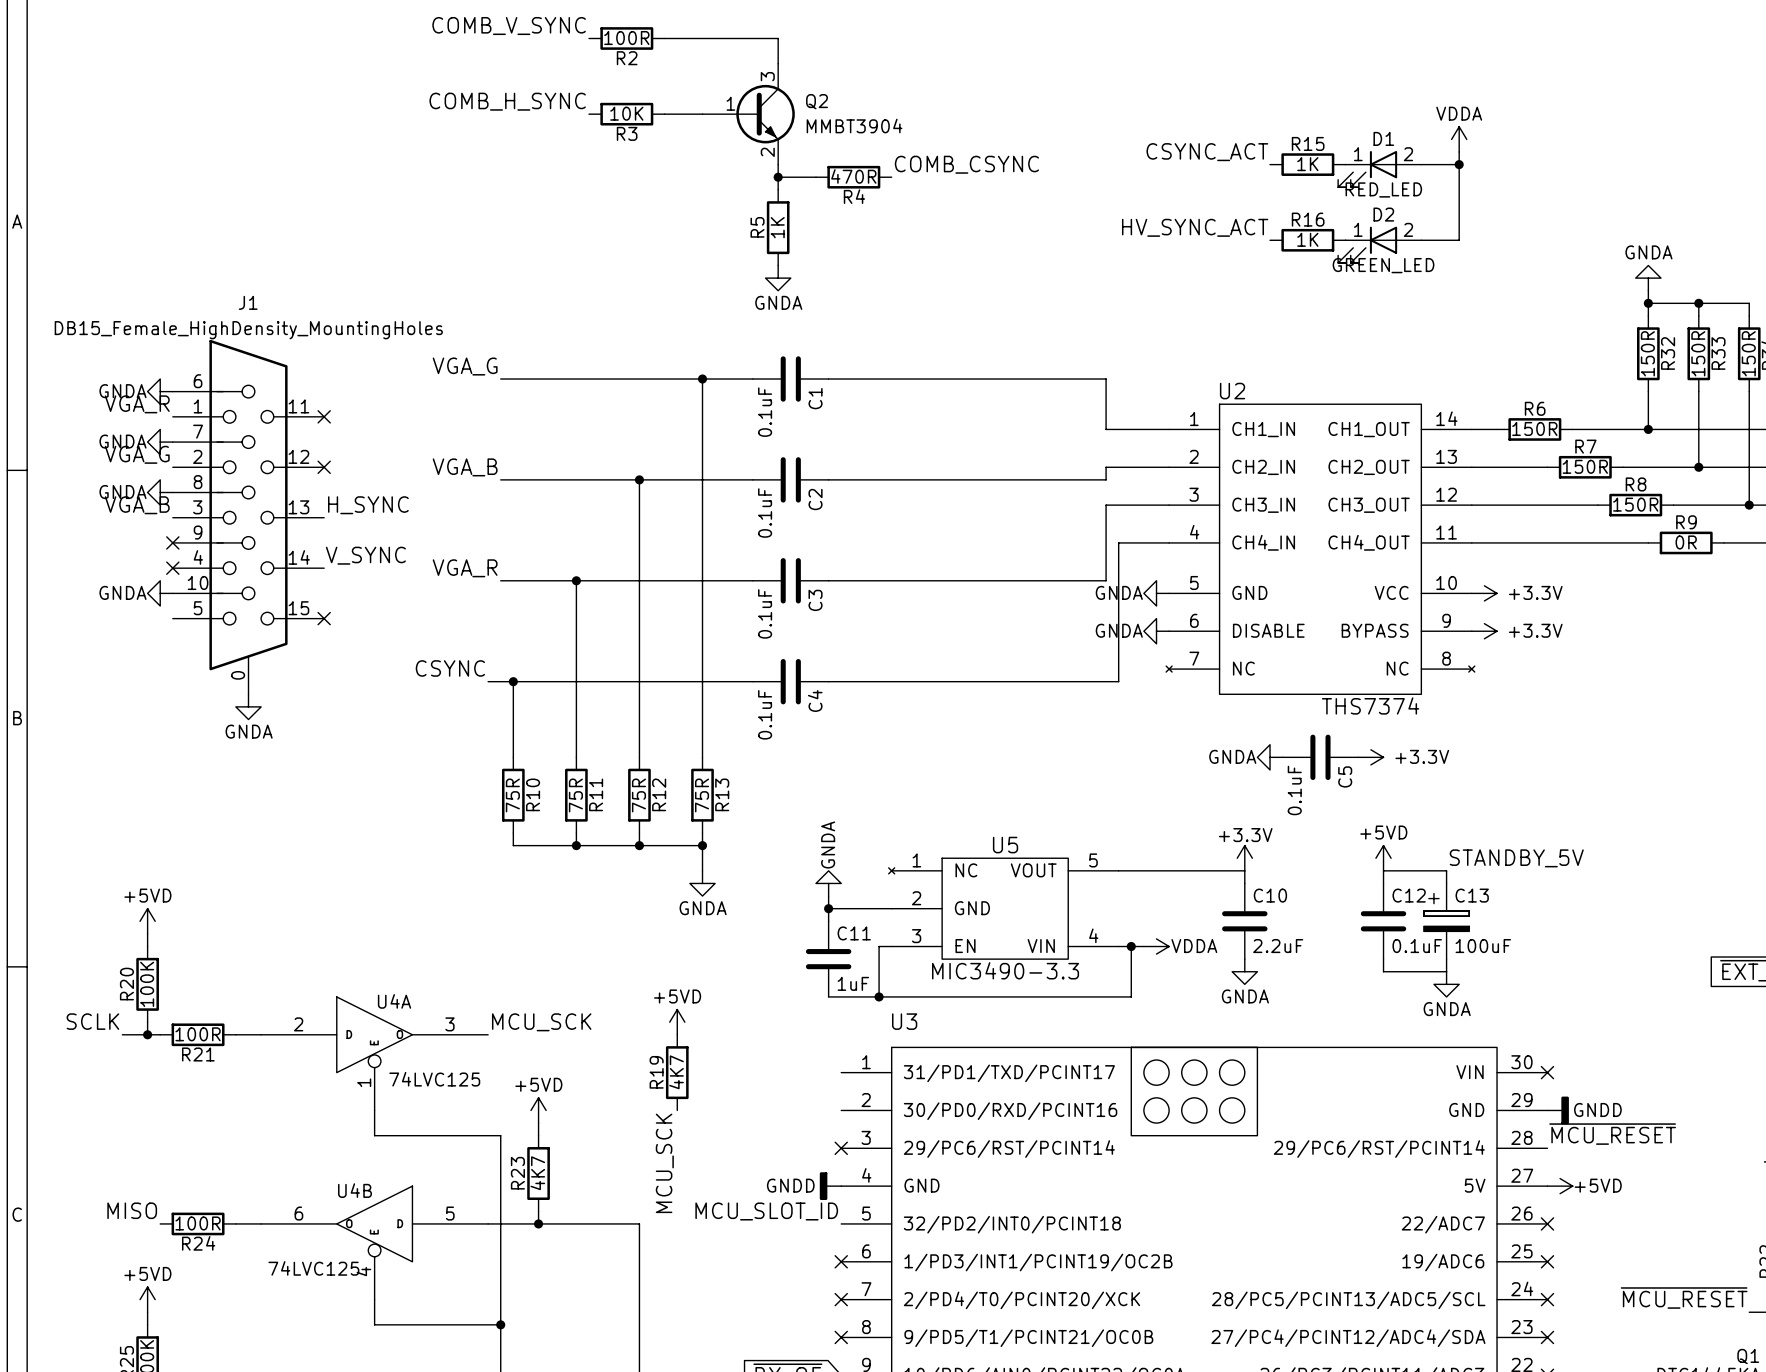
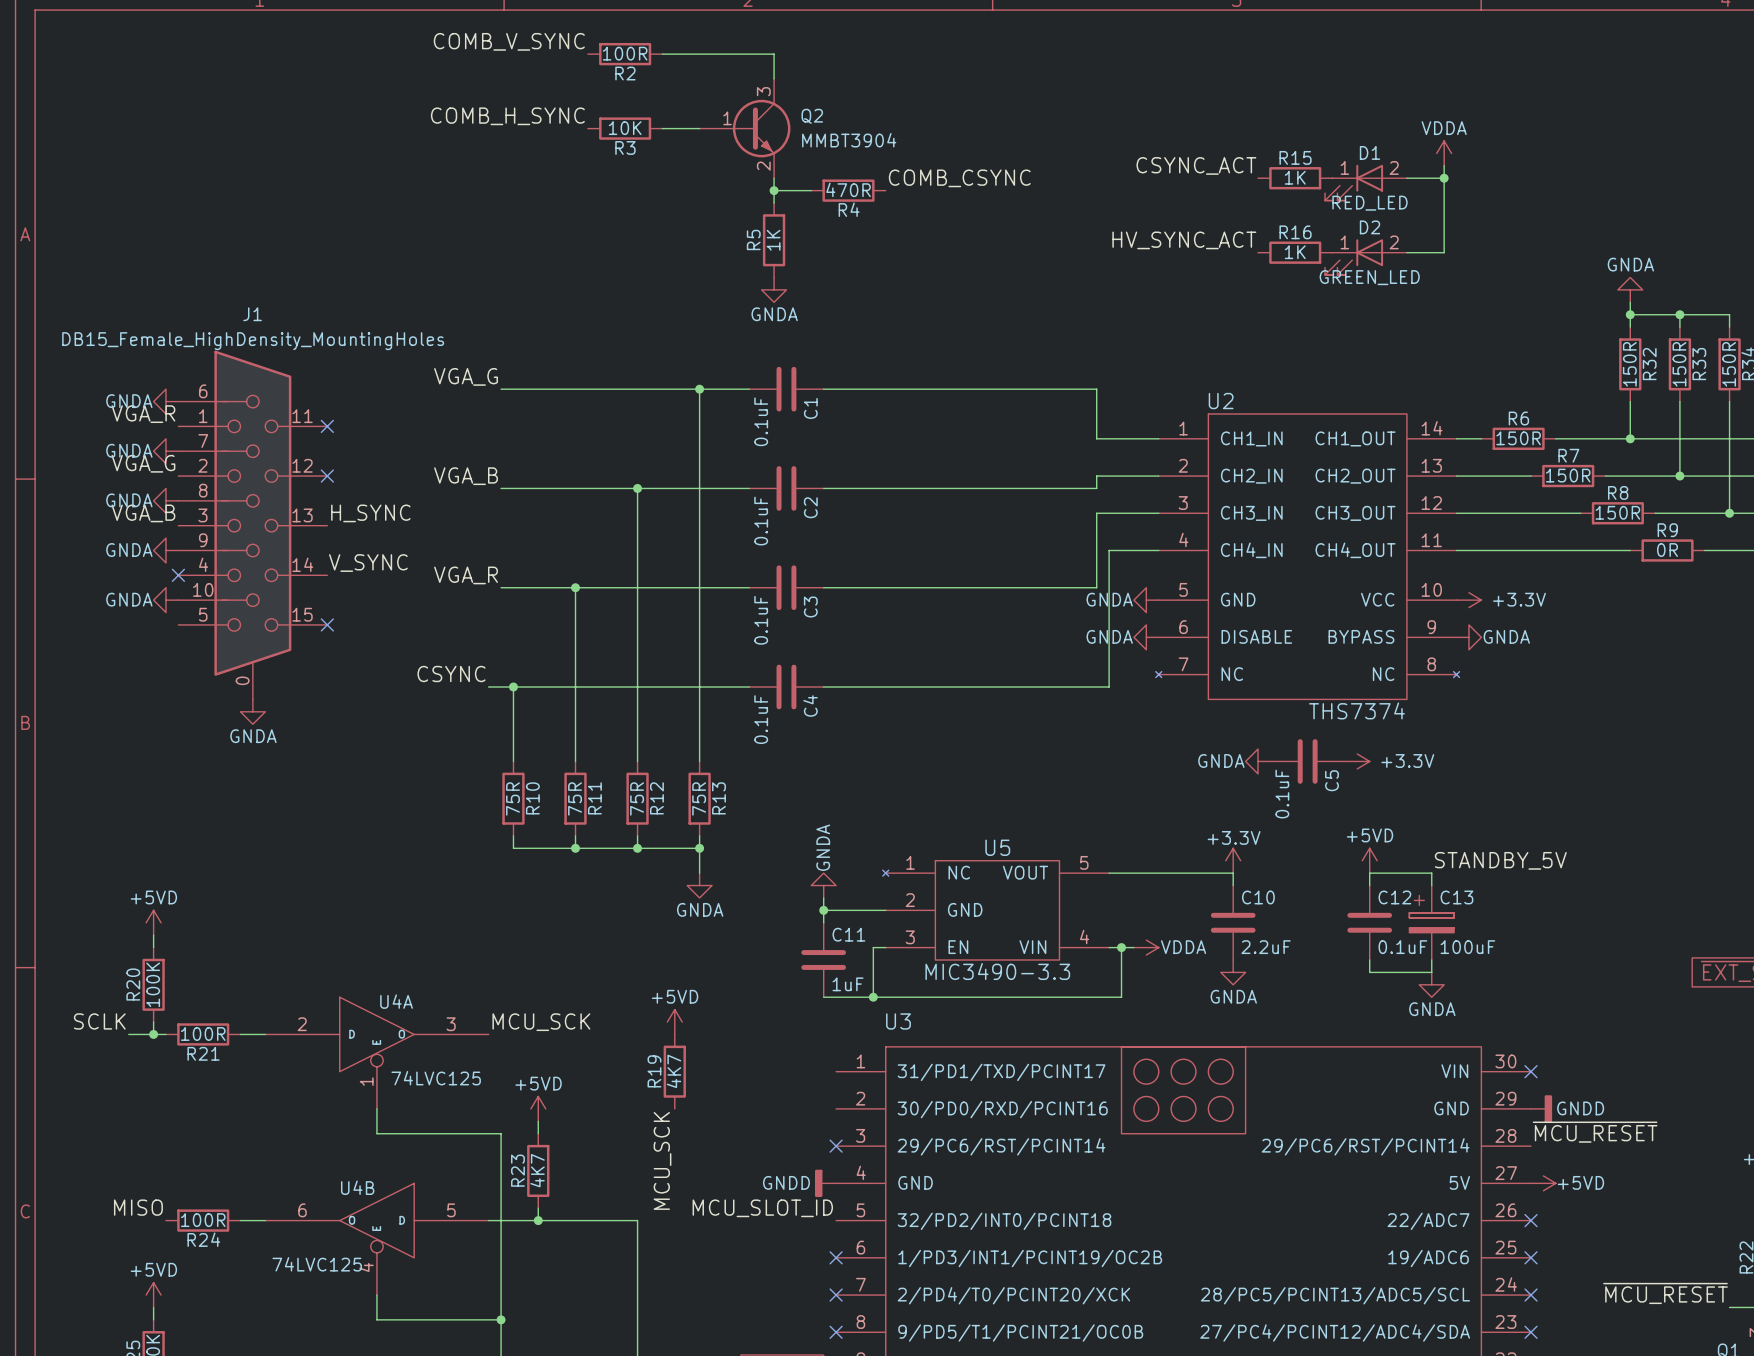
power symbol: none -> GNDA (166, 550)
no-connect mark: (172, 542) -> none
power symbol: +3.3V (1484, 631) -> GNDA (1468, 637)

